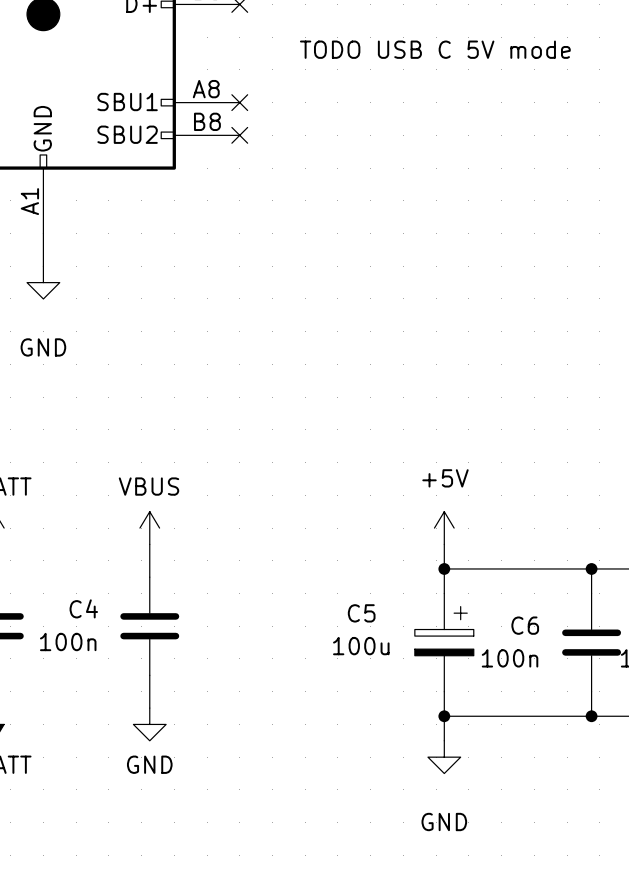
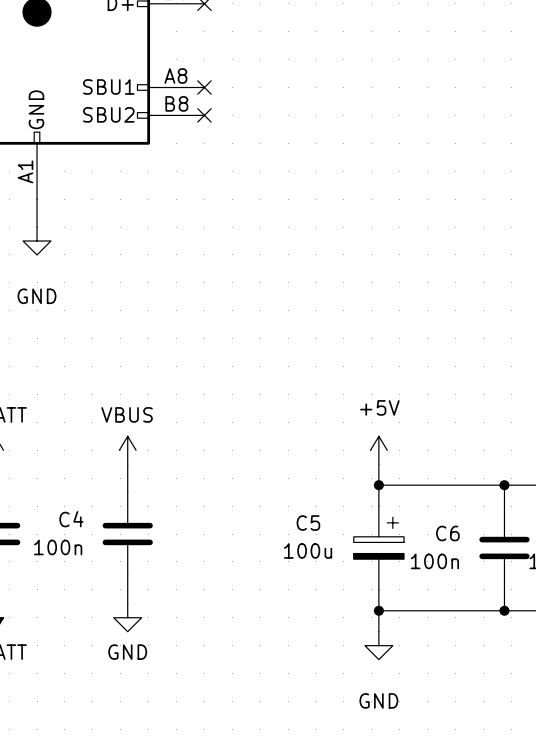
text: TODO USB C 5V mode (435, 49) -> none

